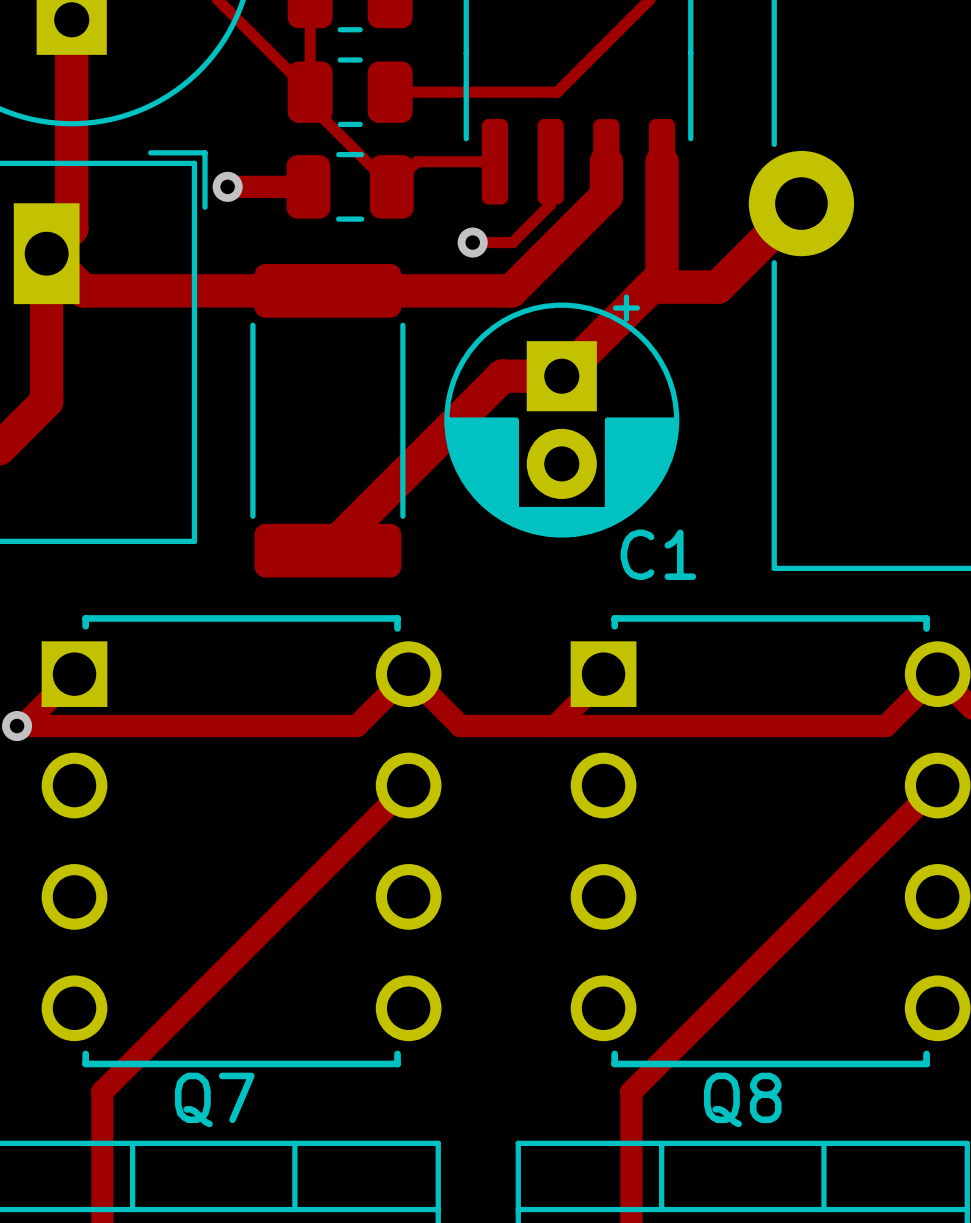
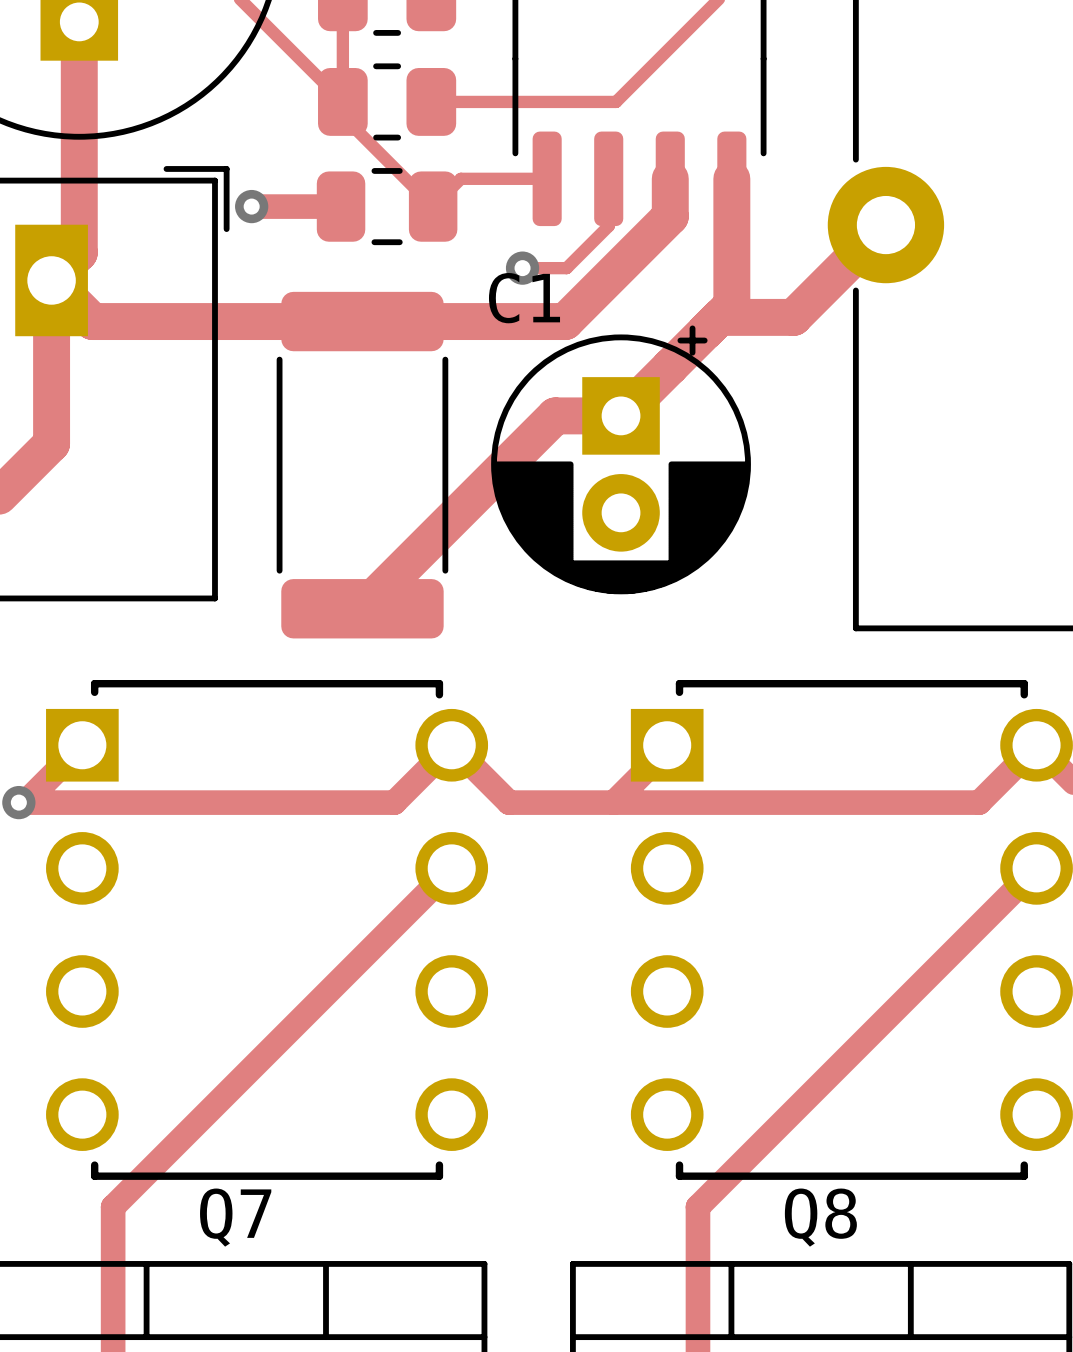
C1 name position: C1 (658, 554) -> C1 (524, 298)

